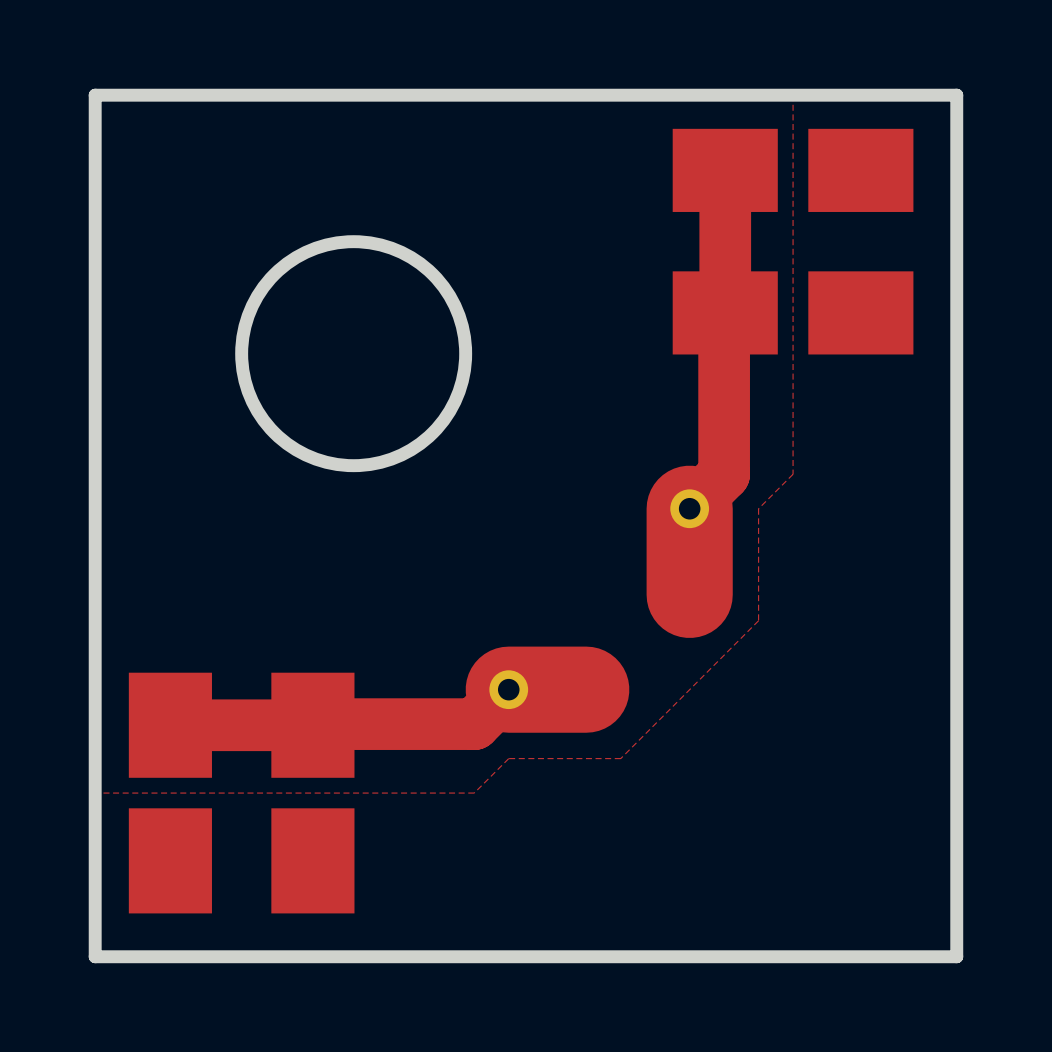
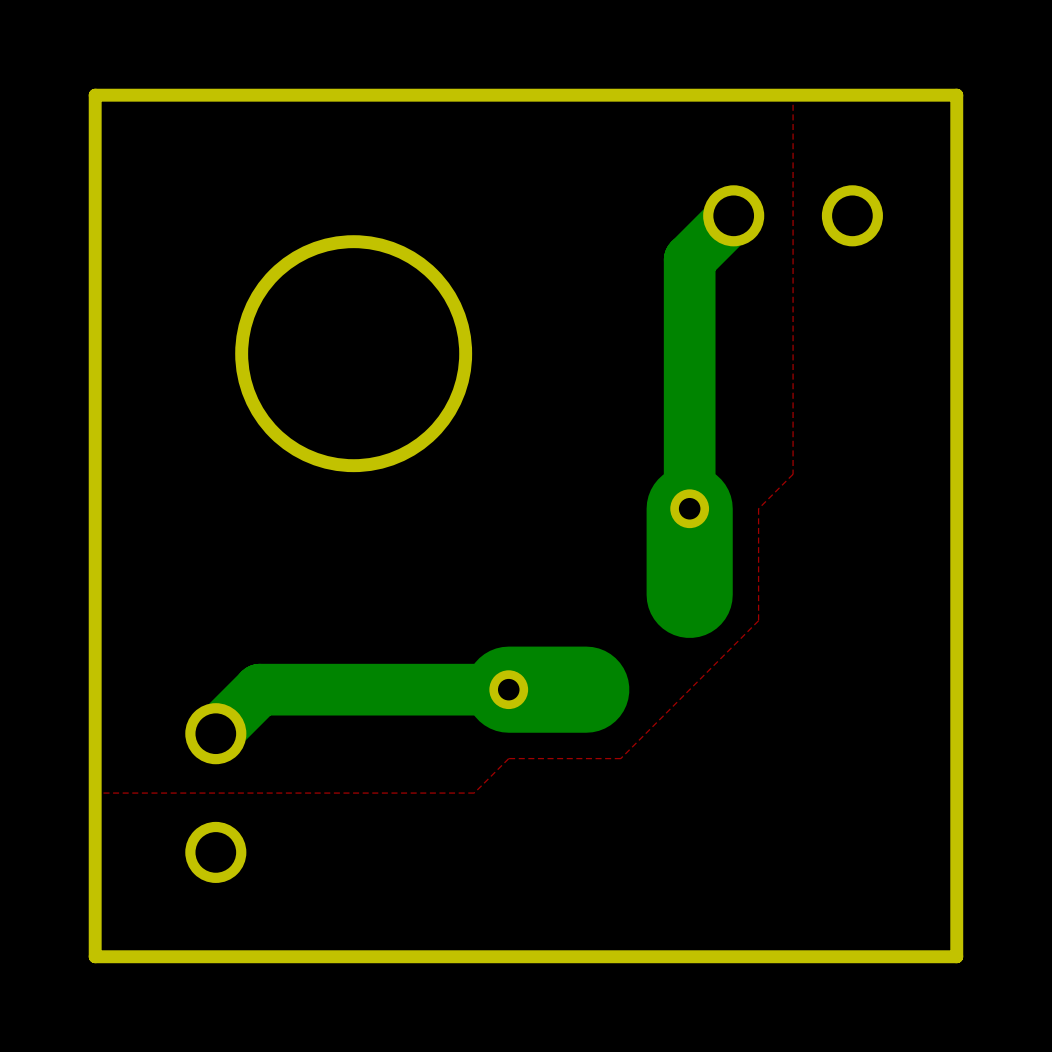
part footprint: [672, 128, 914, 355] -> [703, 185, 883, 247]
top track: (725, 170) (724, 474) (689, 508) (689, 594) -> none
bottom track: none -> (733, 215) (689, 259) (689, 594)
part footprint: [128, 672, 355, 914] -> [185, 703, 247, 883]
top track: (586, 689) (508, 689) (474, 724) (170, 725) -> none
bottom track: none -> (586, 689) (259, 689) (215, 733)

